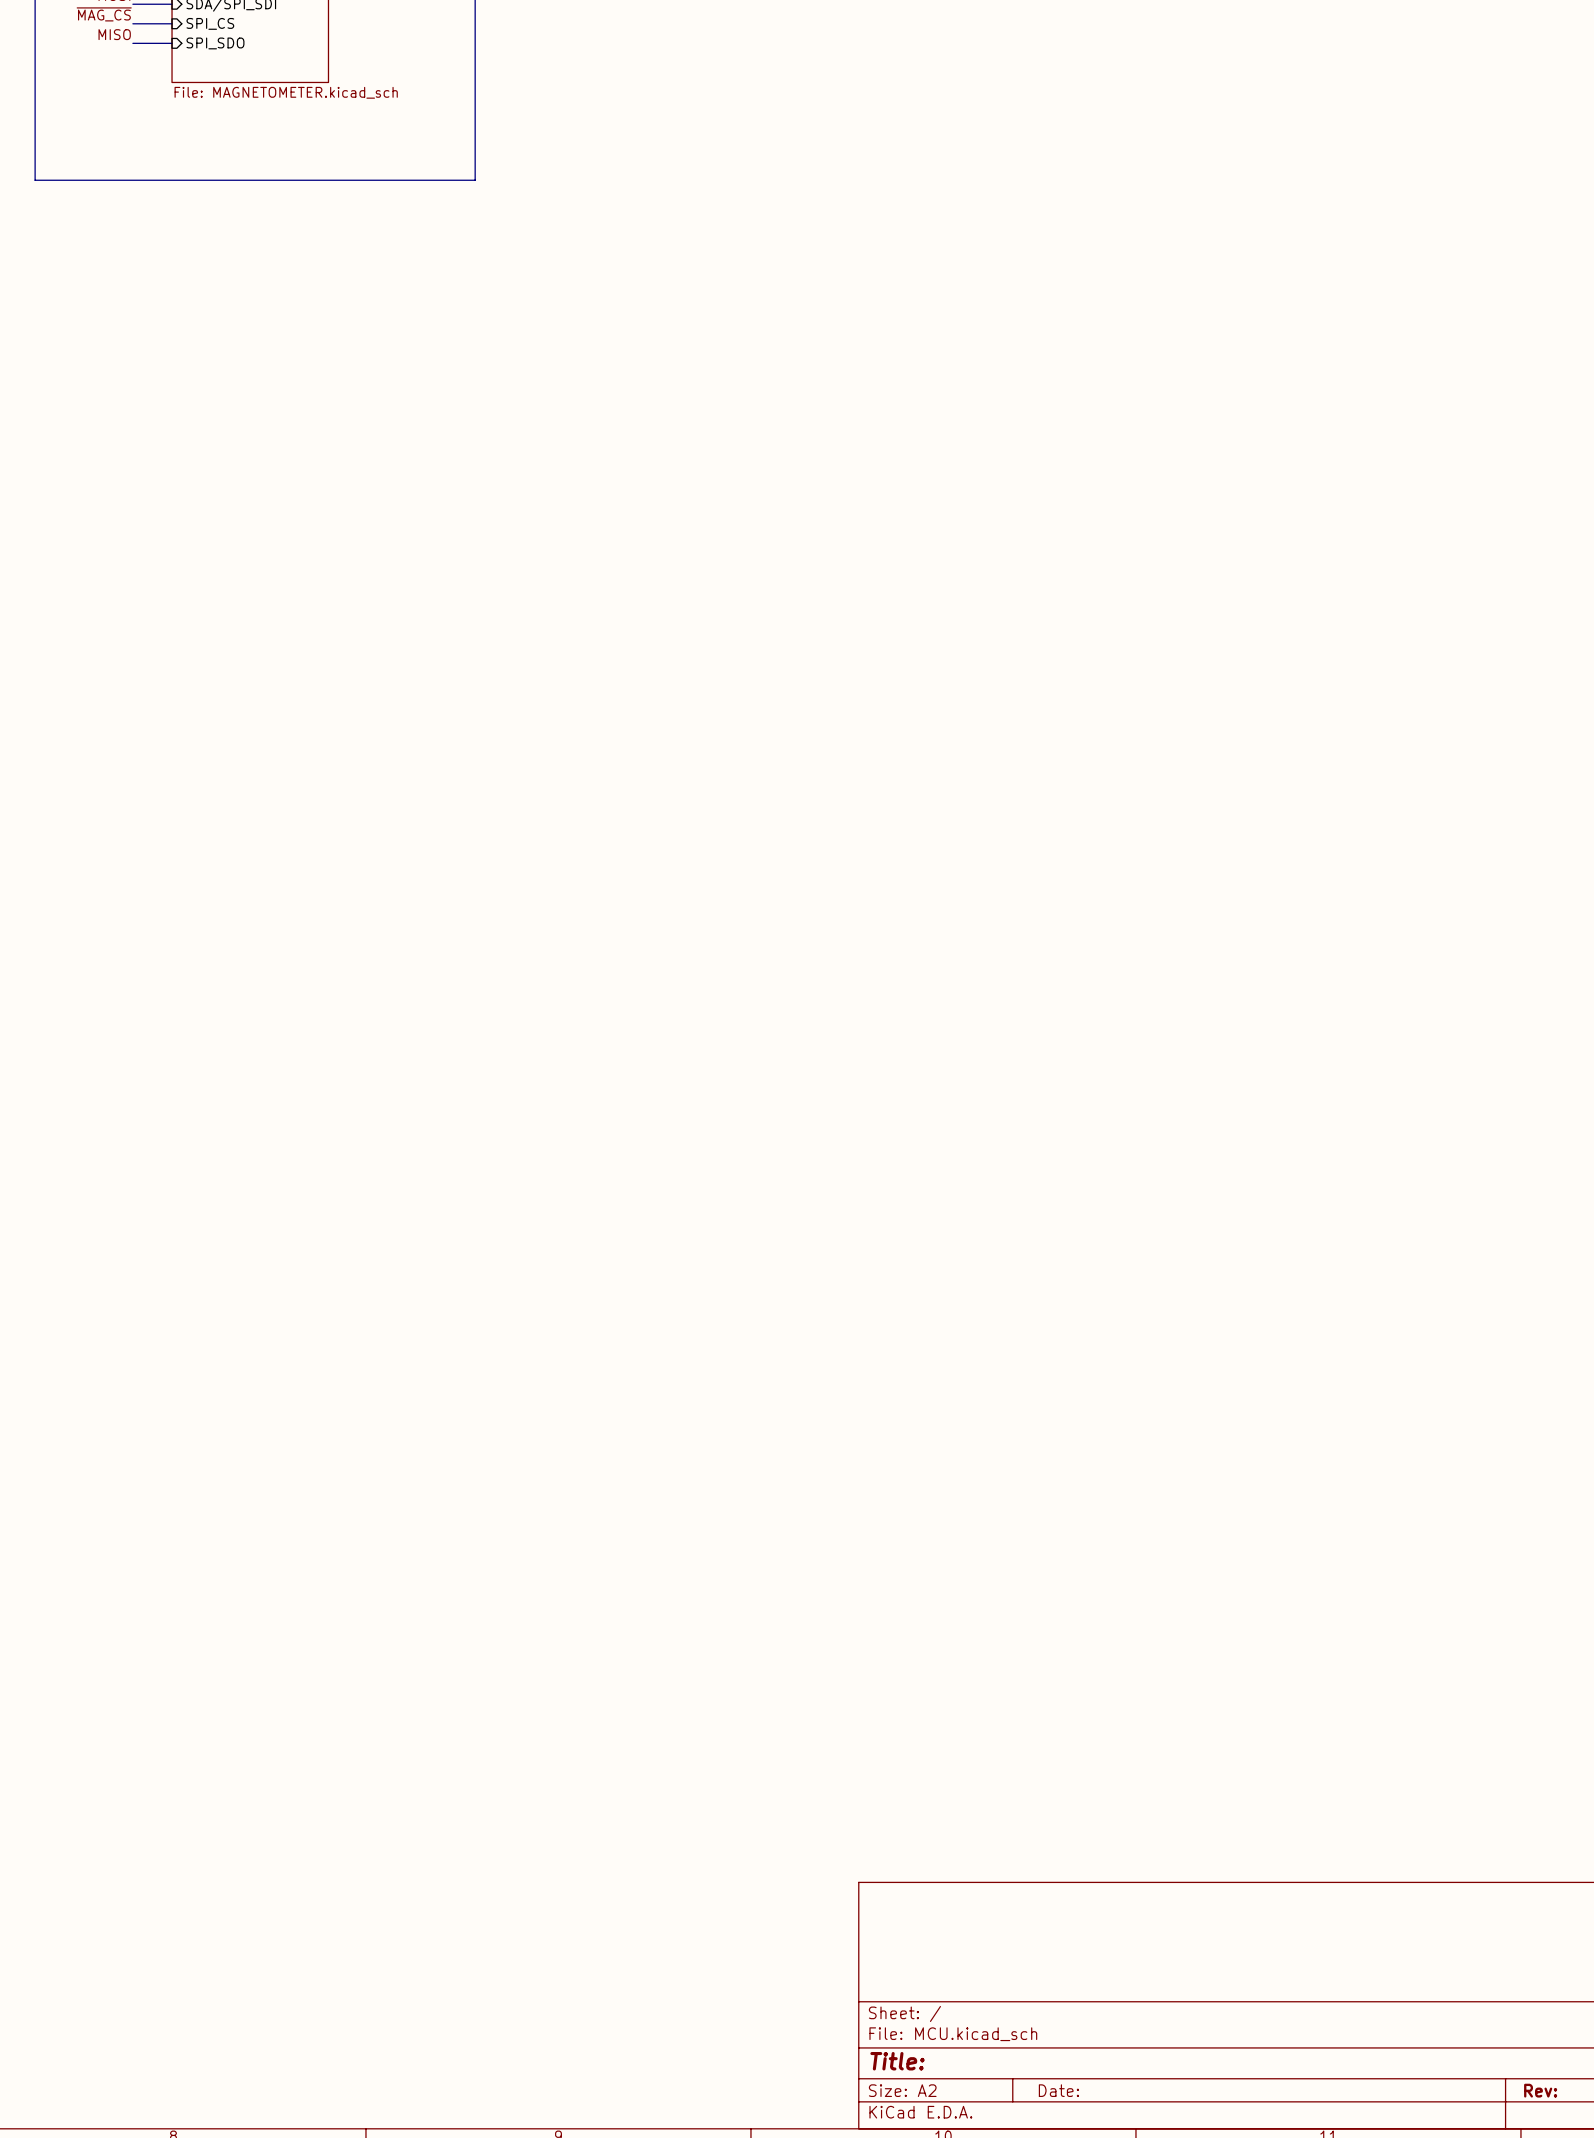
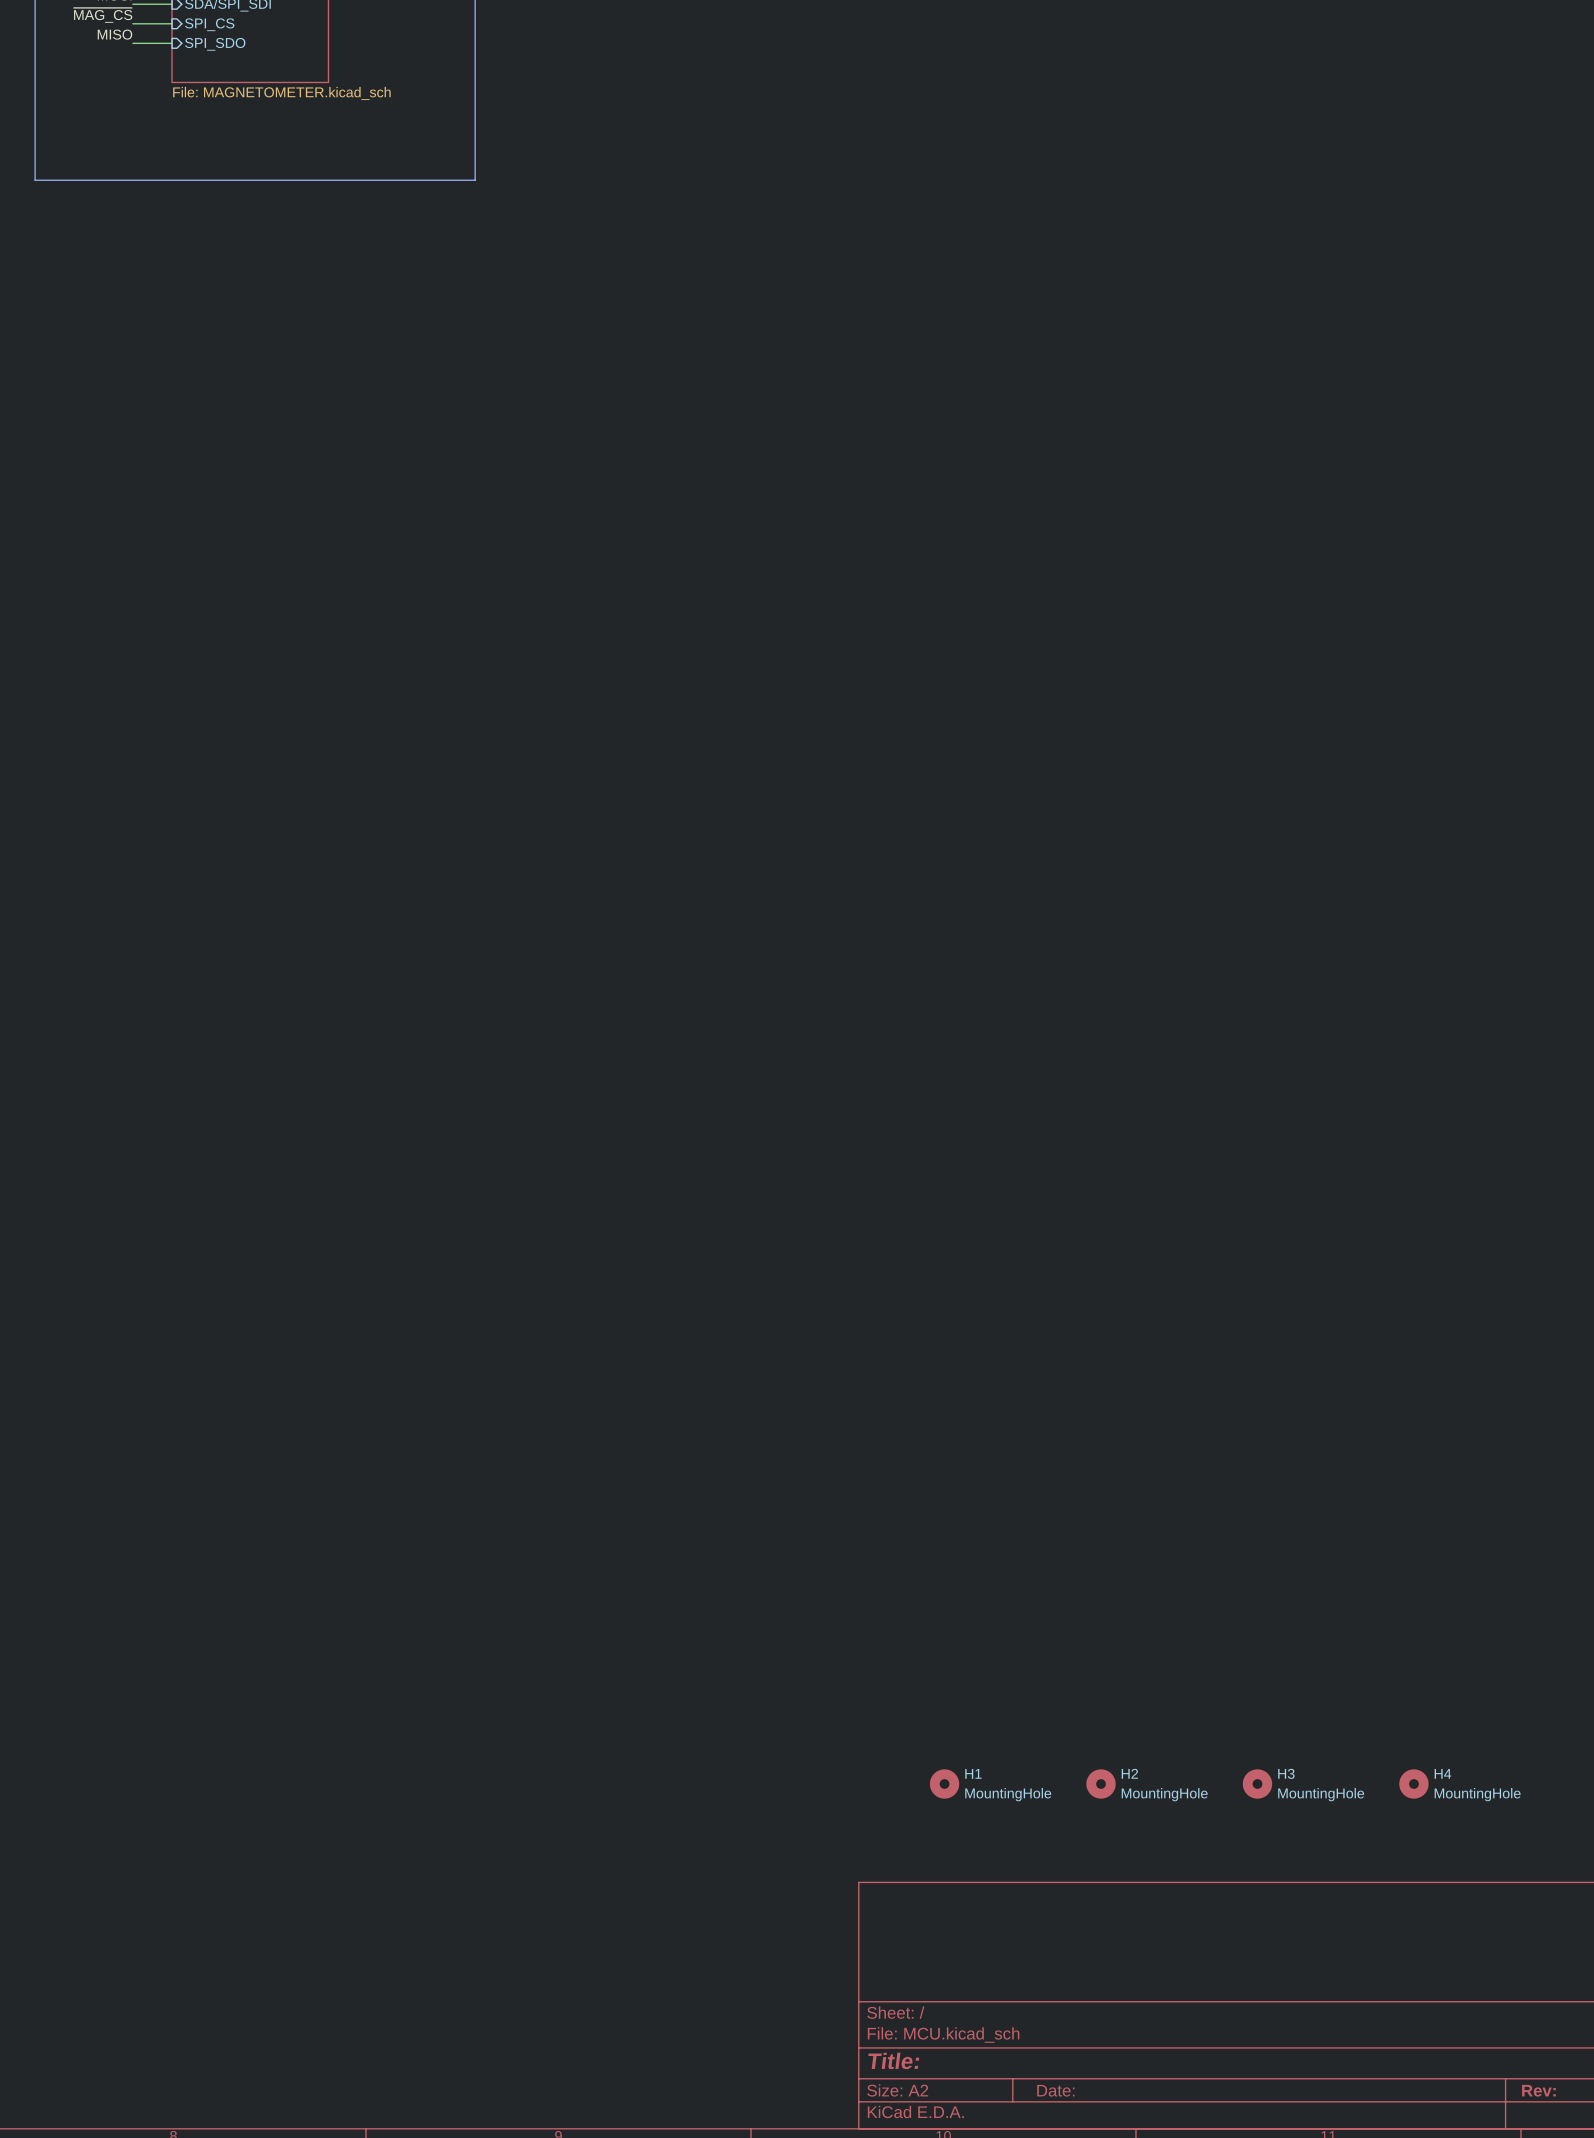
H1: none -> MountingHole (944, 1784)
H2: none -> MountingHole (1101, 1784)
H3: none -> MountingHole (1257, 1784)
H4: none -> MountingHole (1413, 1784)

